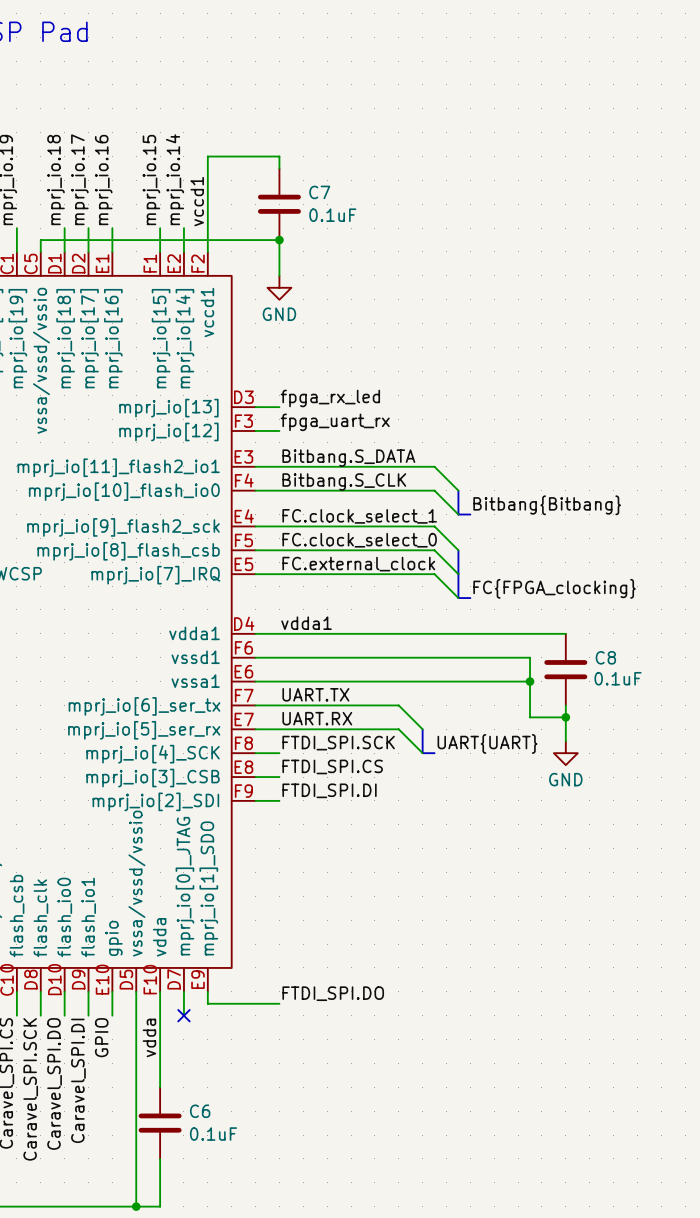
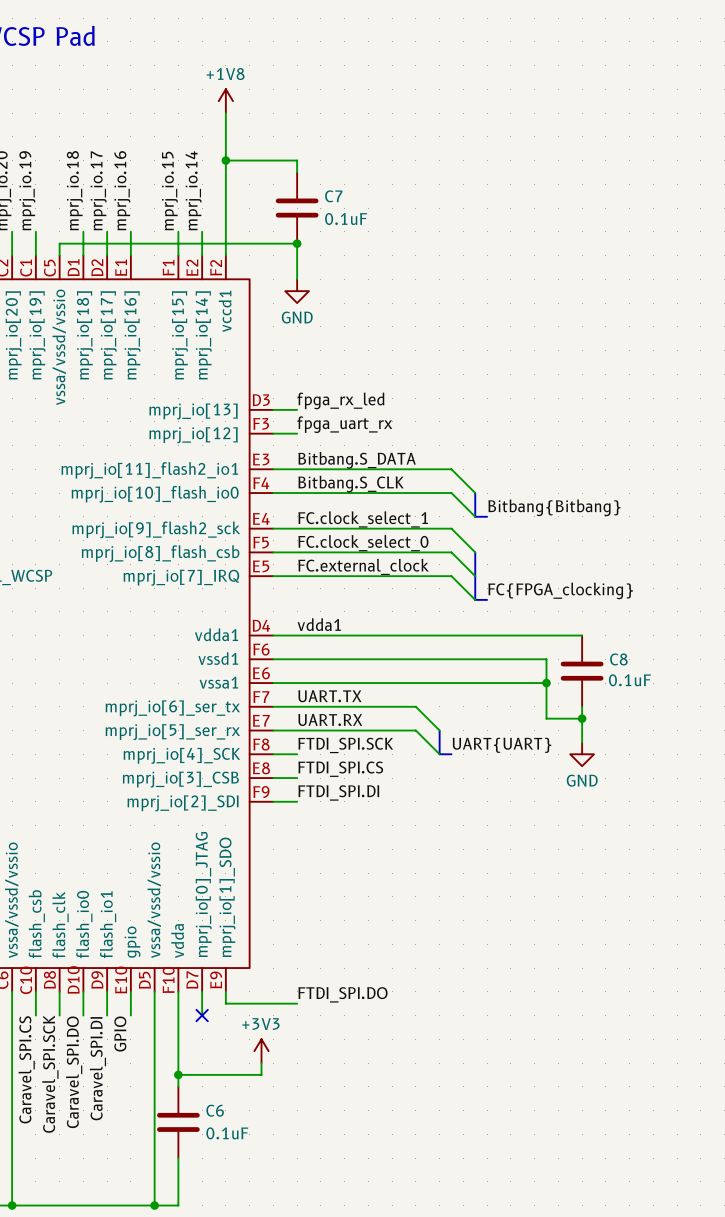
power symbol: none -> +1V8 (225, 101)
wire: none -> (225, 113) (225, 160)
junction: none -> (225, 160)
label: vccd1 (197, 201) -> none
label: vdda (149, 1037) -> none
power symbol: none -> +3V3 (261, 1051)
wire: none -> (261, 1063) (261, 1074) (178, 1074)
junction: none -> (178, 1074)

